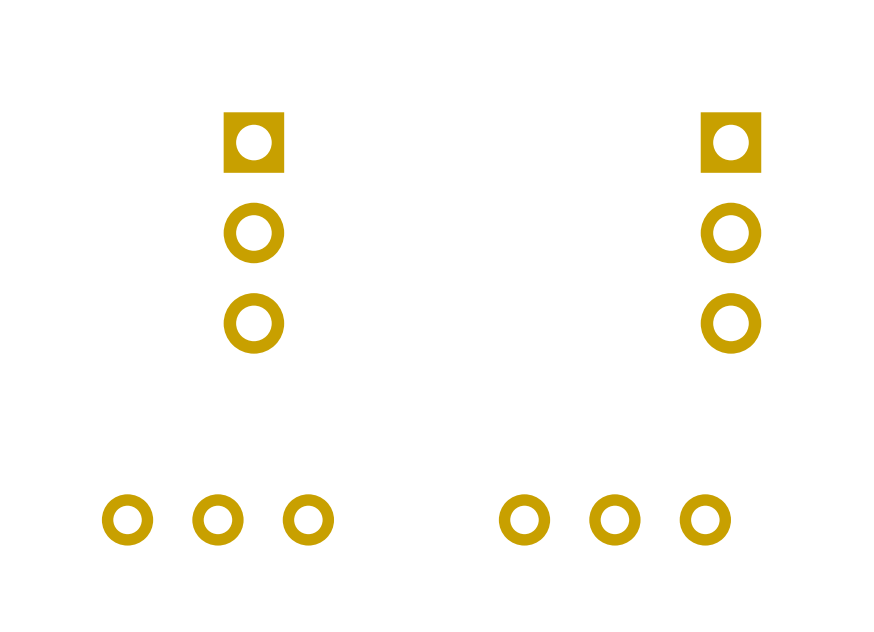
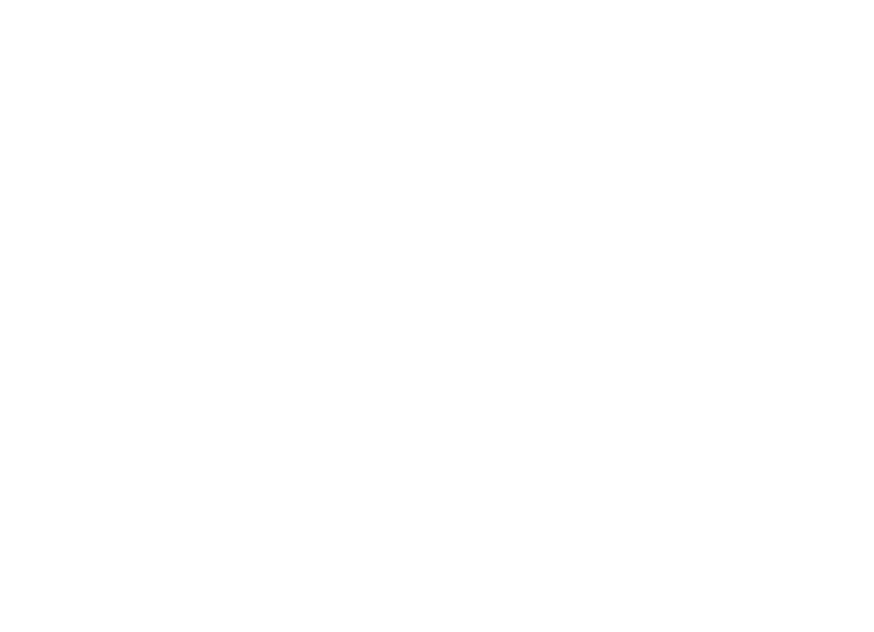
part: (253, 232) -> none
part: (730, 232) -> none
part: (217, 519) -> none
part: (614, 519) -> none

